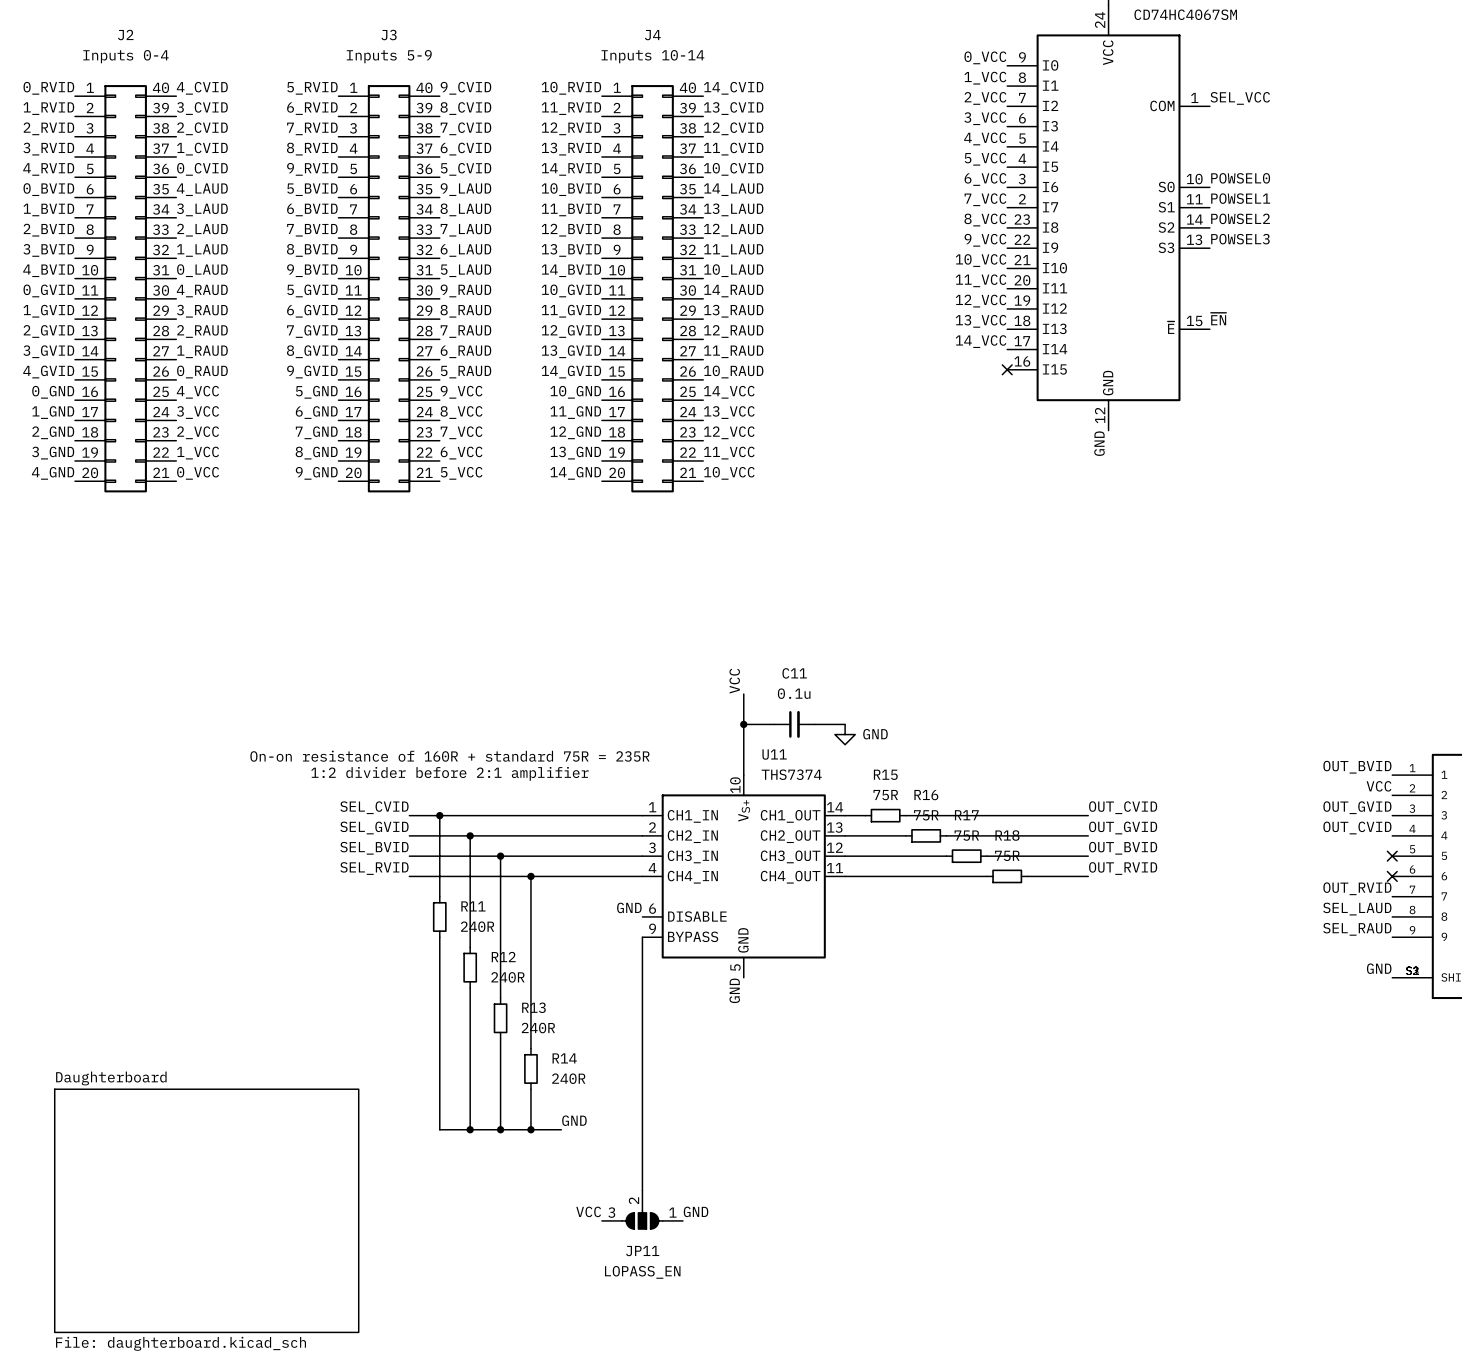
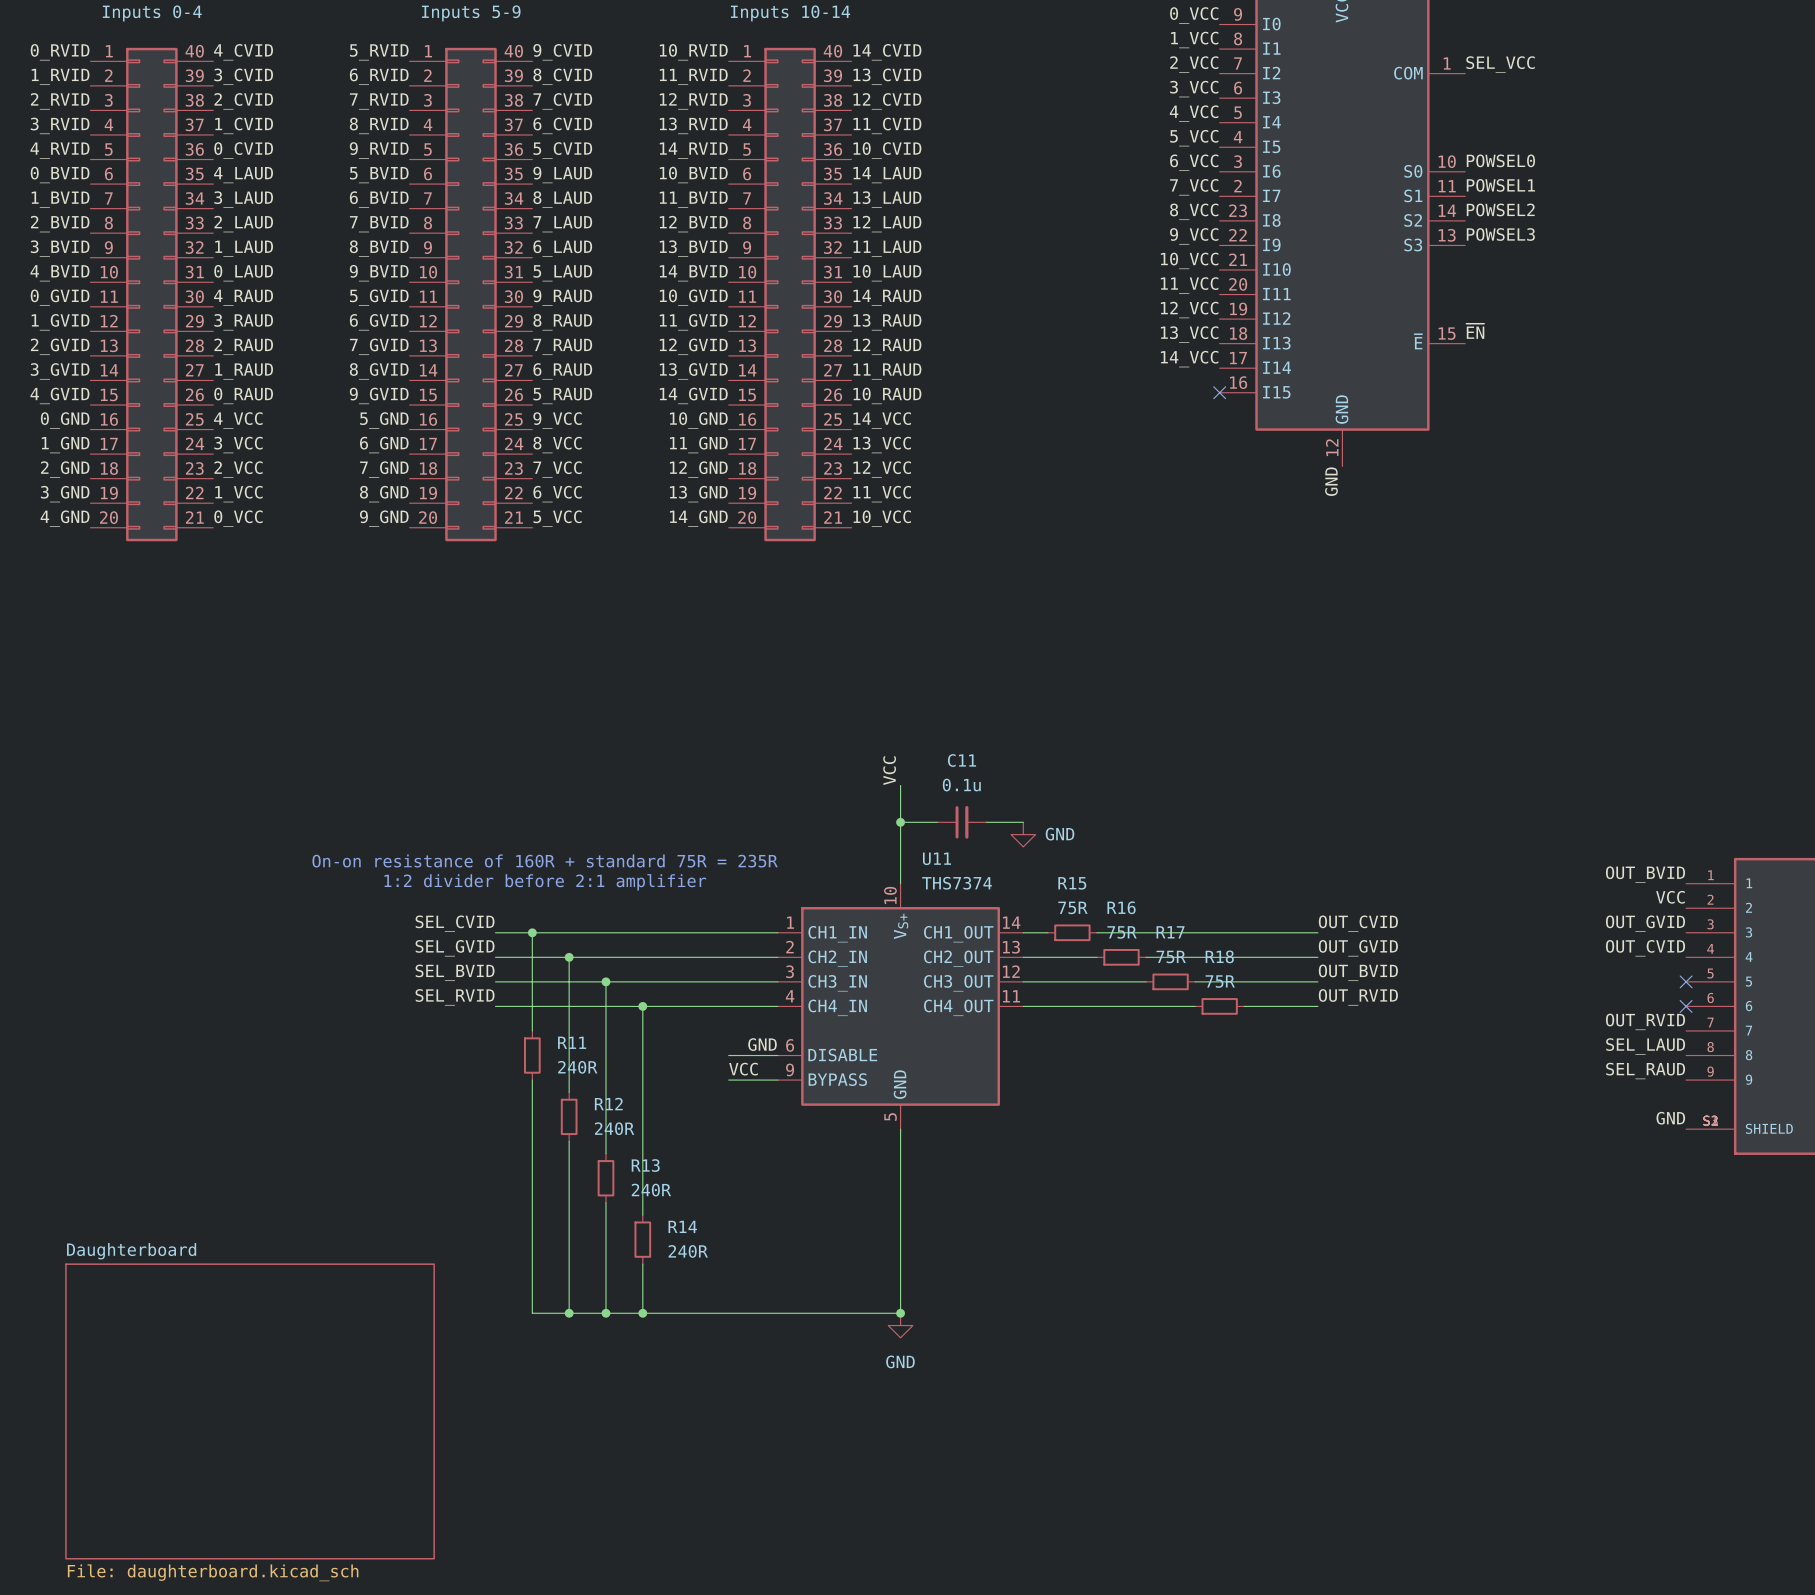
wire: none -> (728, 1055) (777, 1055)
label: none -> VCC (743, 1069)
wire: (642, 937) (642, 1190) -> (777, 1080) (728, 1080)
wire: none -> (900, 1129) (900, 1313) (679, 1313)
label: GND (734, 990) -> none
label: GND (574, 1120) -> none
junction: none -> (900, 1313)
power symbol: none -> GND (900, 1325)
JP11: LOPASS_EN (642, 1209) -> none
label: VCC (588, 1211) -> none
label: GND (696, 1211) -> none

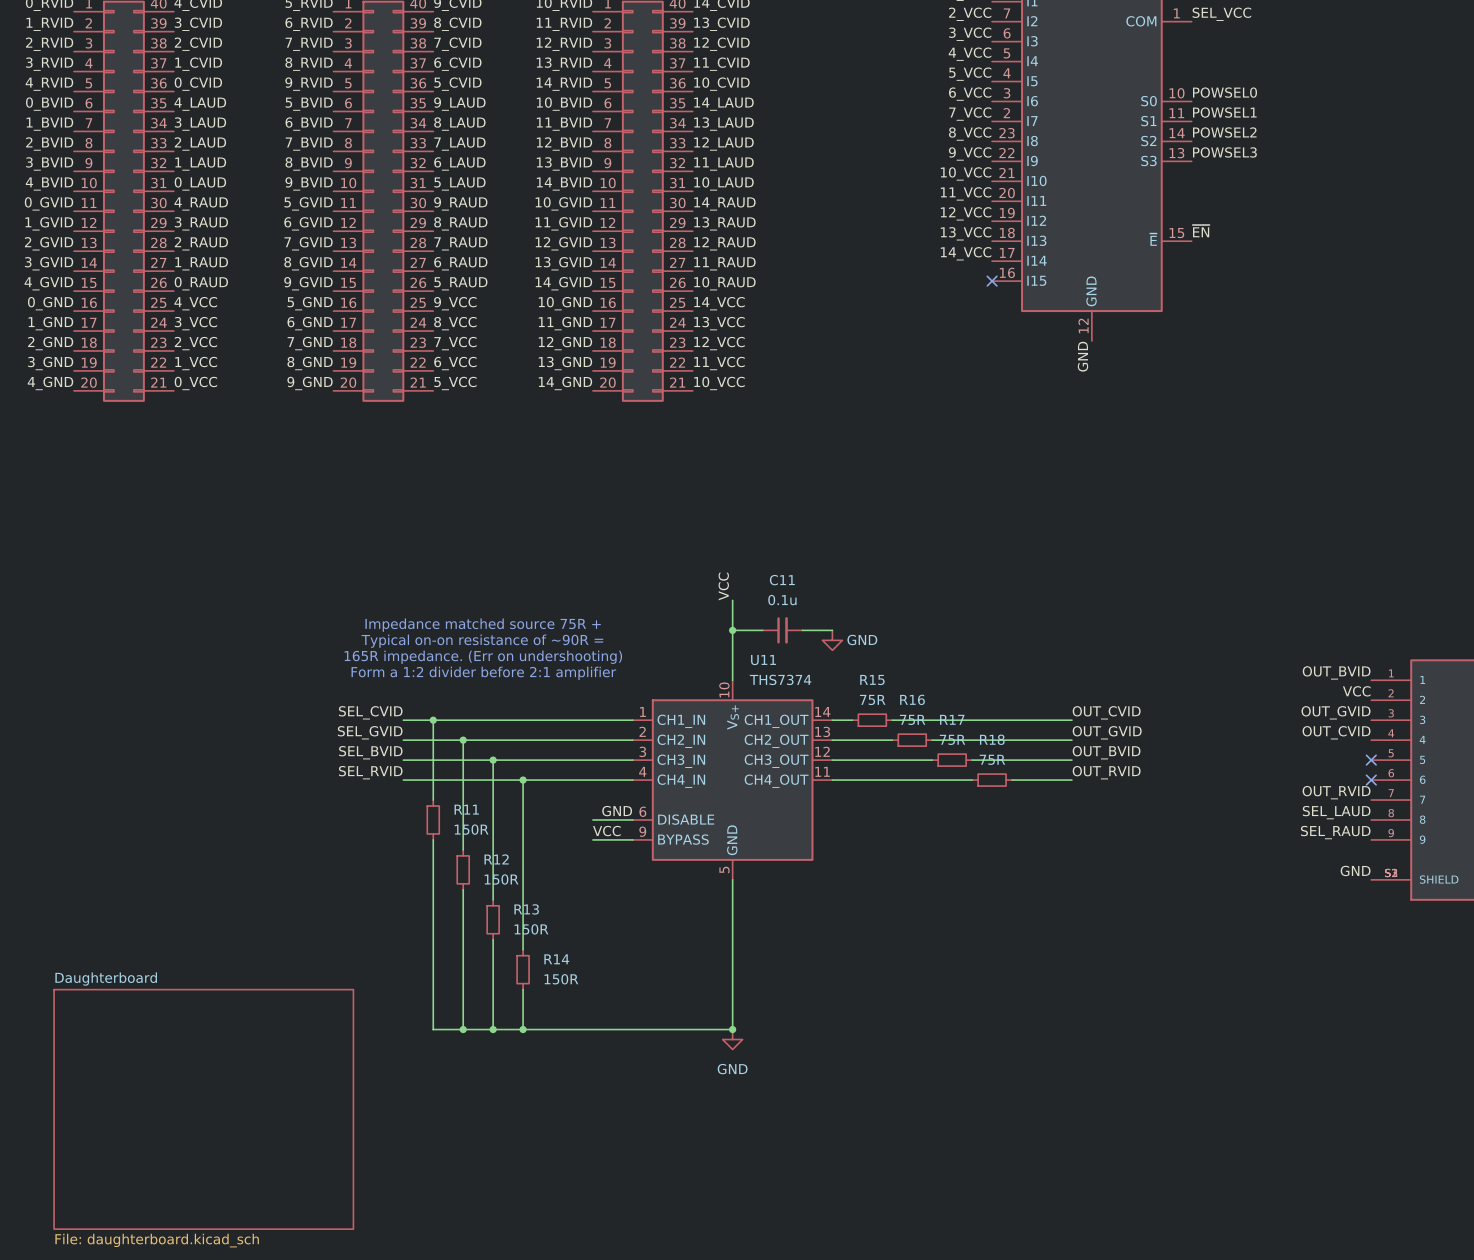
text: none -> Impedance matched source 75R + (483, 625)
text: none -> Typical on-on resistance of ~90R = (482, 641)
text: none -> 165R impedance. (Err on undershooting) (483, 657)
text: On-on resistance of 160R + standard 75R = 235R (545, 860) -> none
text: 1:2 divider before 2:1 amplifier (545, 882) -> Form a 1:2 divider before 2:1 amplifier (483, 673)
R11 value: 240R (577, 1067) -> 150R (471, 829)
R12 value: 240R (614, 1128) -> 150R (501, 879)
R13 value: 240R (651, 1190) -> 150R (531, 929)
R14 value: 240R (688, 1251) -> 150R (561, 979)

